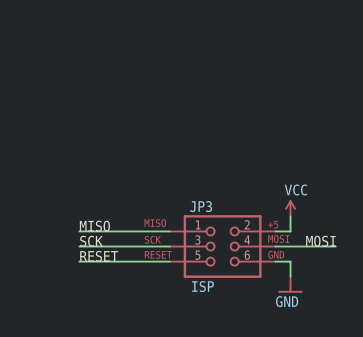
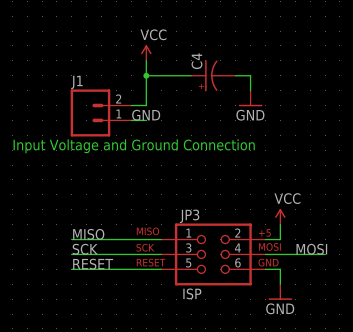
power symbol: none -> VCC (146, 53)
wire: none -> (146, 60) (146, 105) (131, 105)
wire: none -> (146, 75) (191, 75)
junction: none -> (146, 75)
C4: none -> (213, 75)
wire: none -> (235, 75) (250, 75) (250, 90)
power symbol: none -> GND (250, 98)
J1: none -> (101, 112)
label: none -> GND (146, 115)
wire: none -> (131, 120) (146, 120)
text: none -> Input Voltage and Ground Connection (134, 146)

